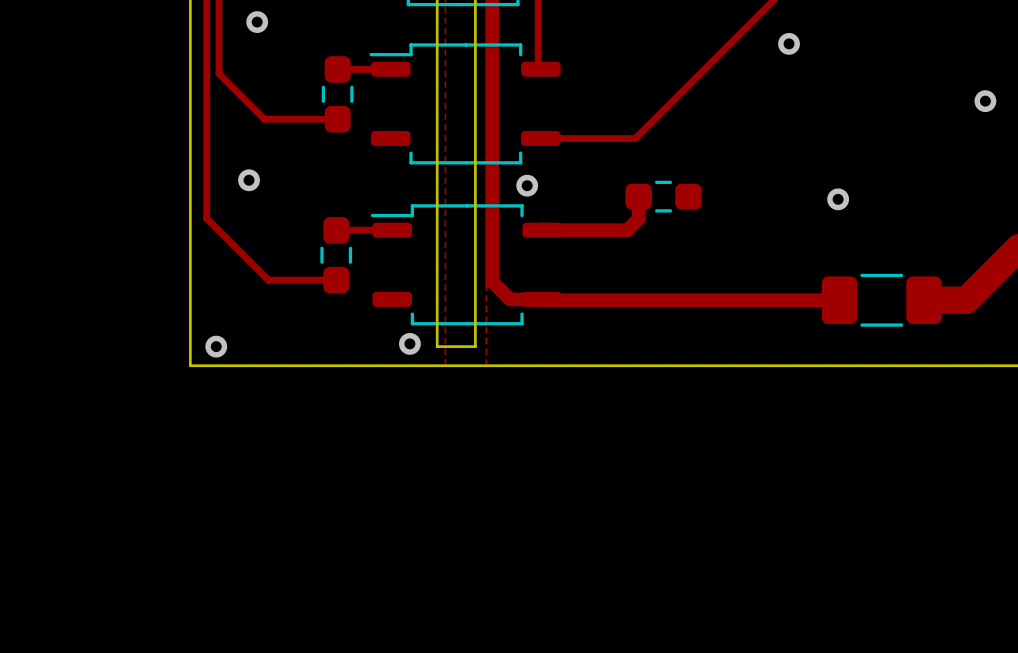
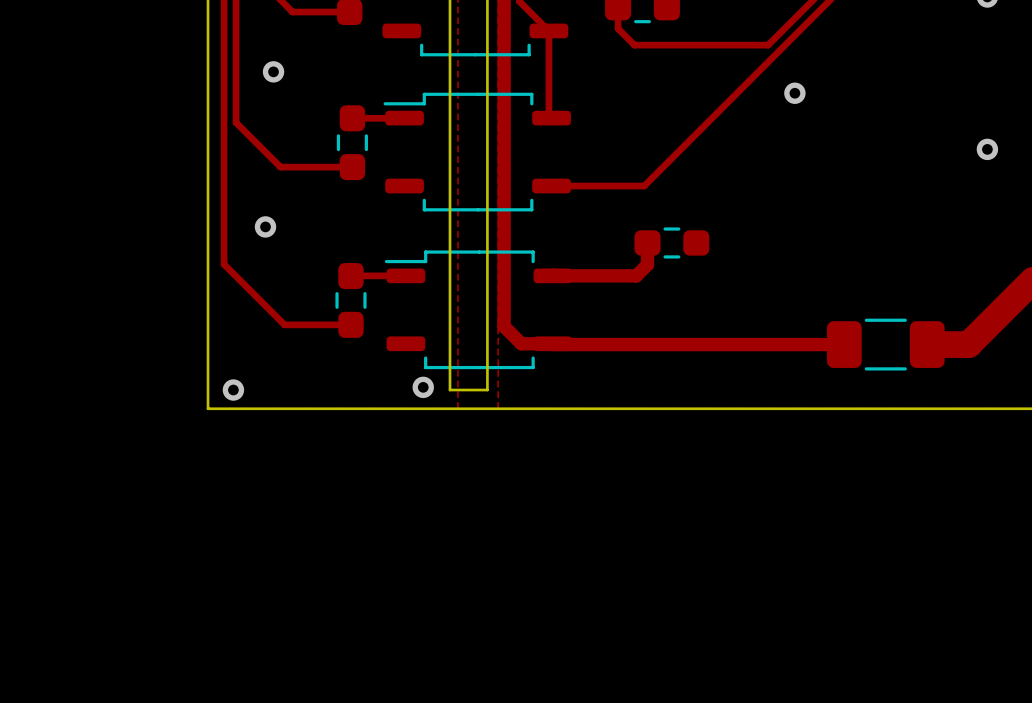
via: (527, 185) -> none
via: (838, 199) -> none

